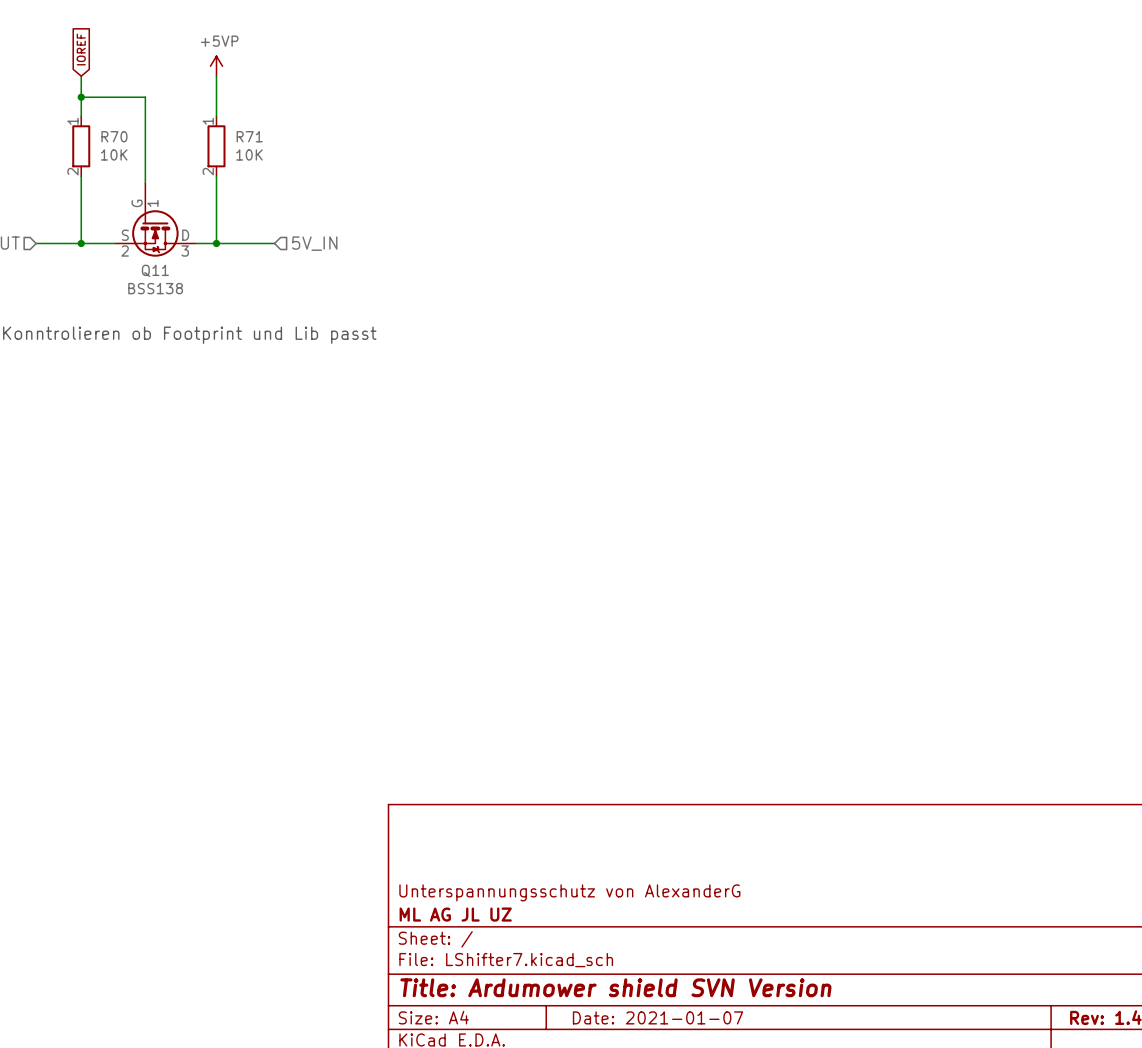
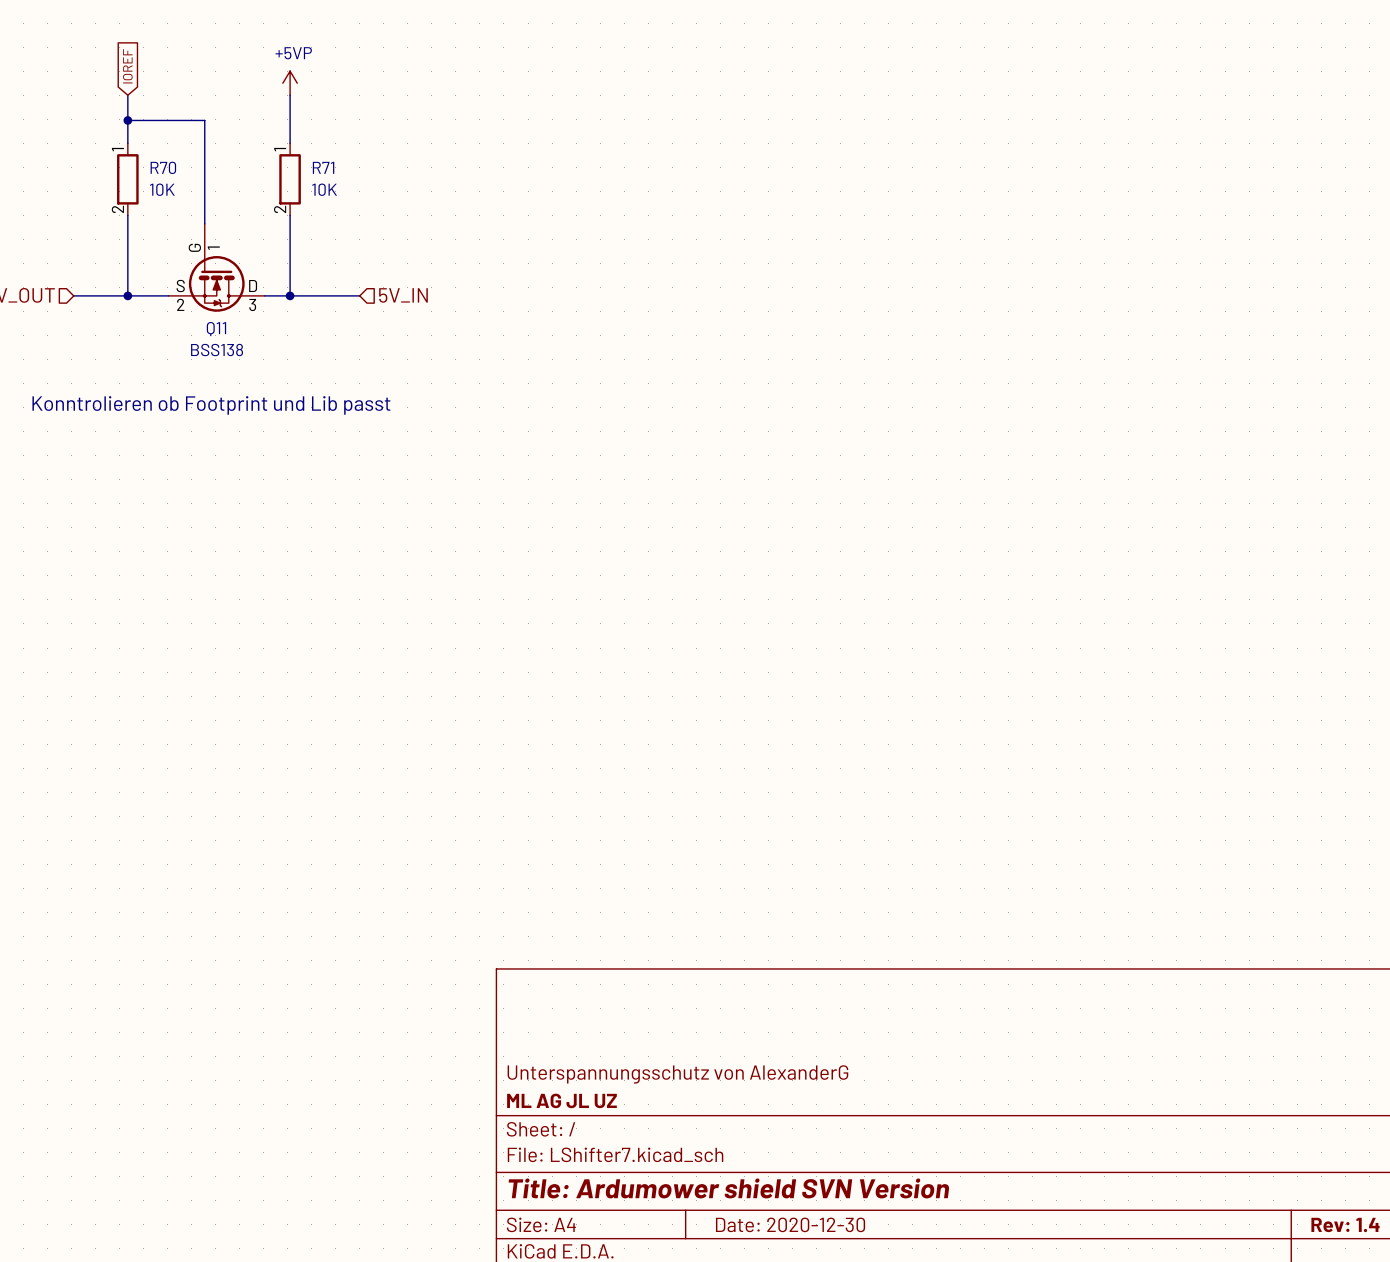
title block: Date: 2021-01-07 (658, 1017) -> Date: 2020-12-30 (790, 1224)

